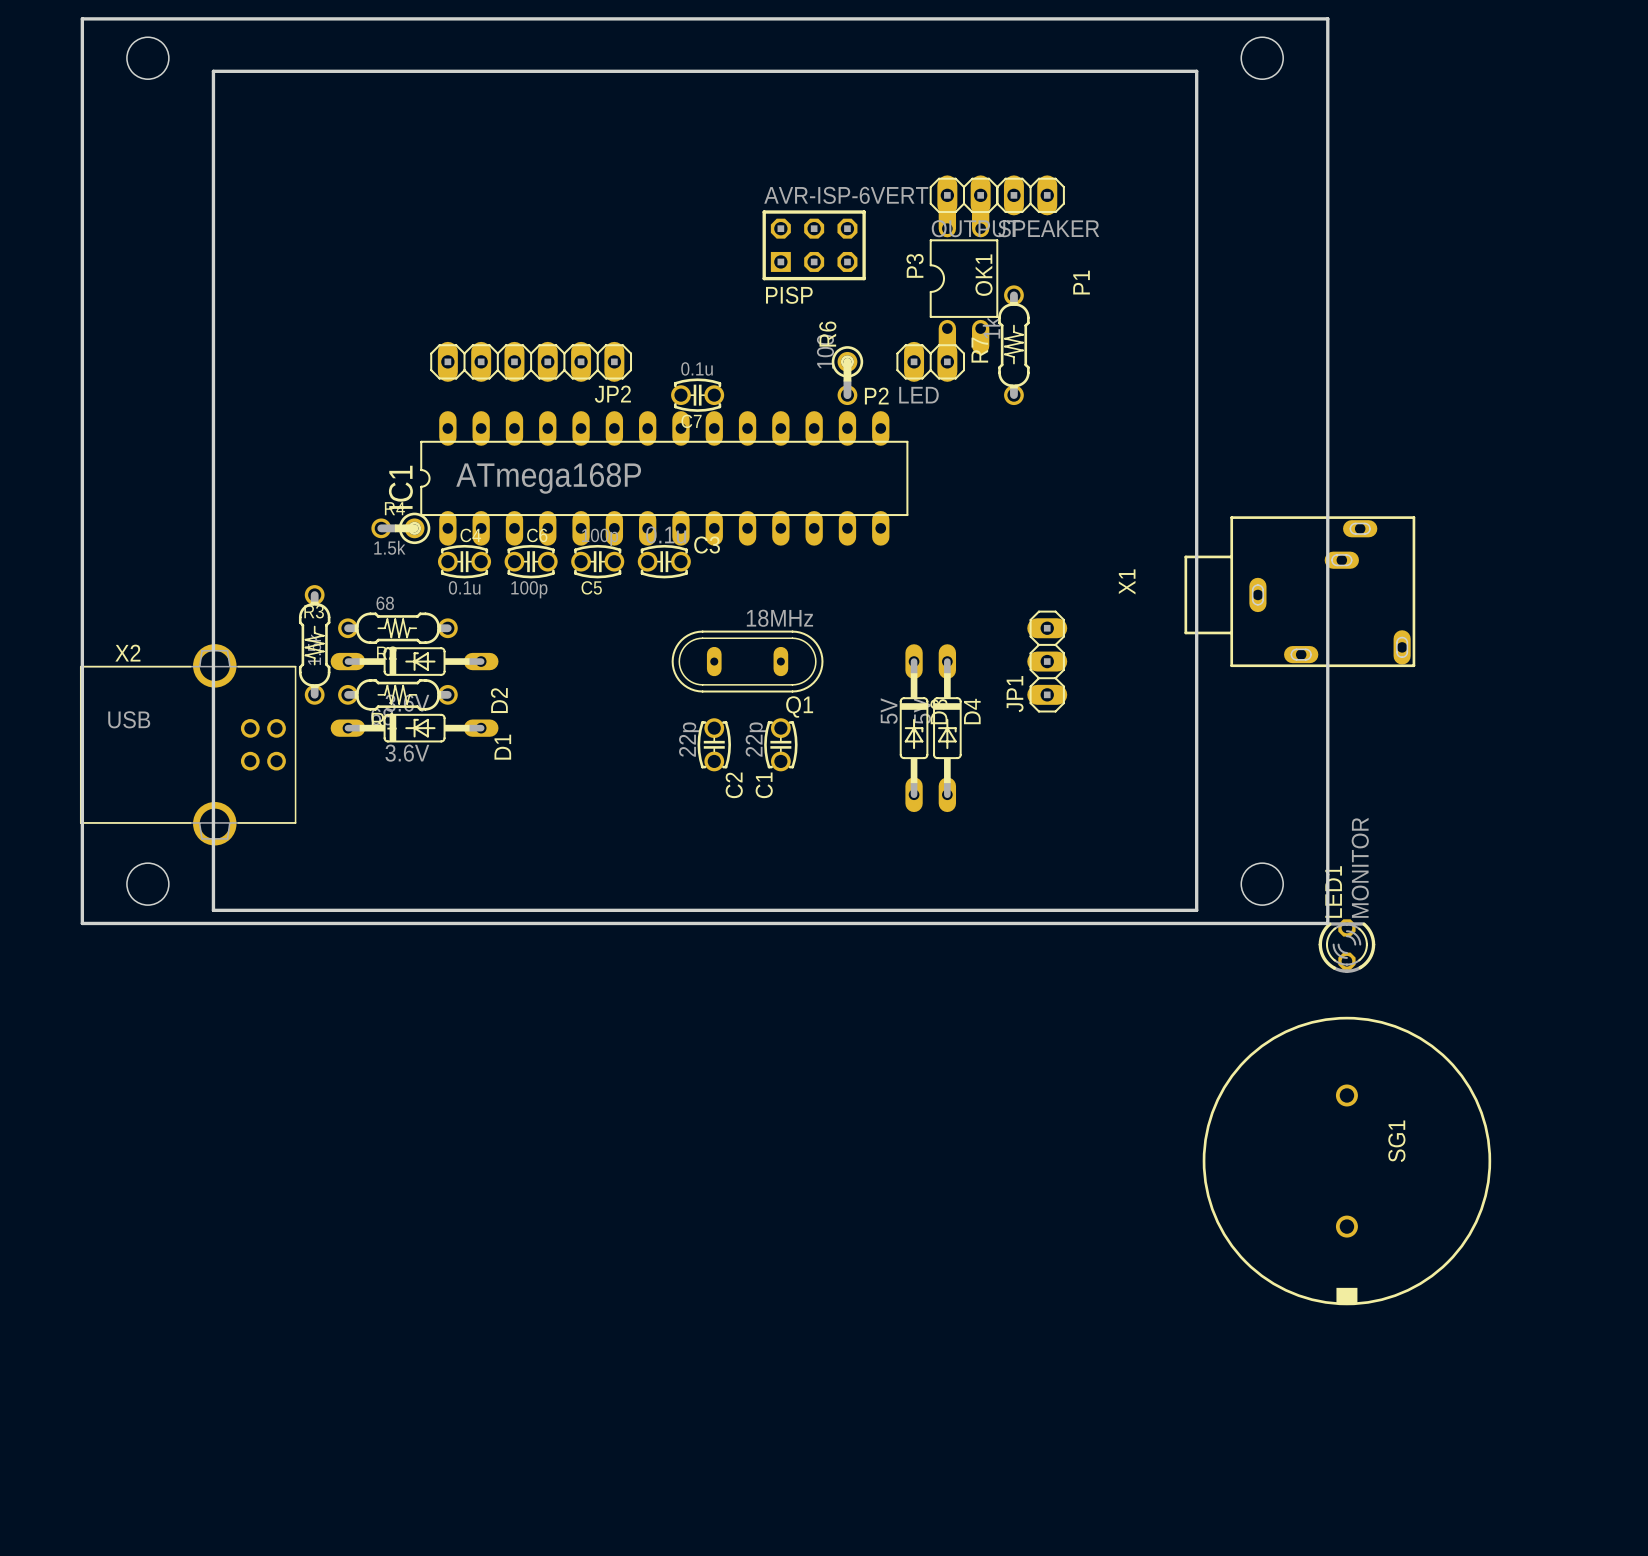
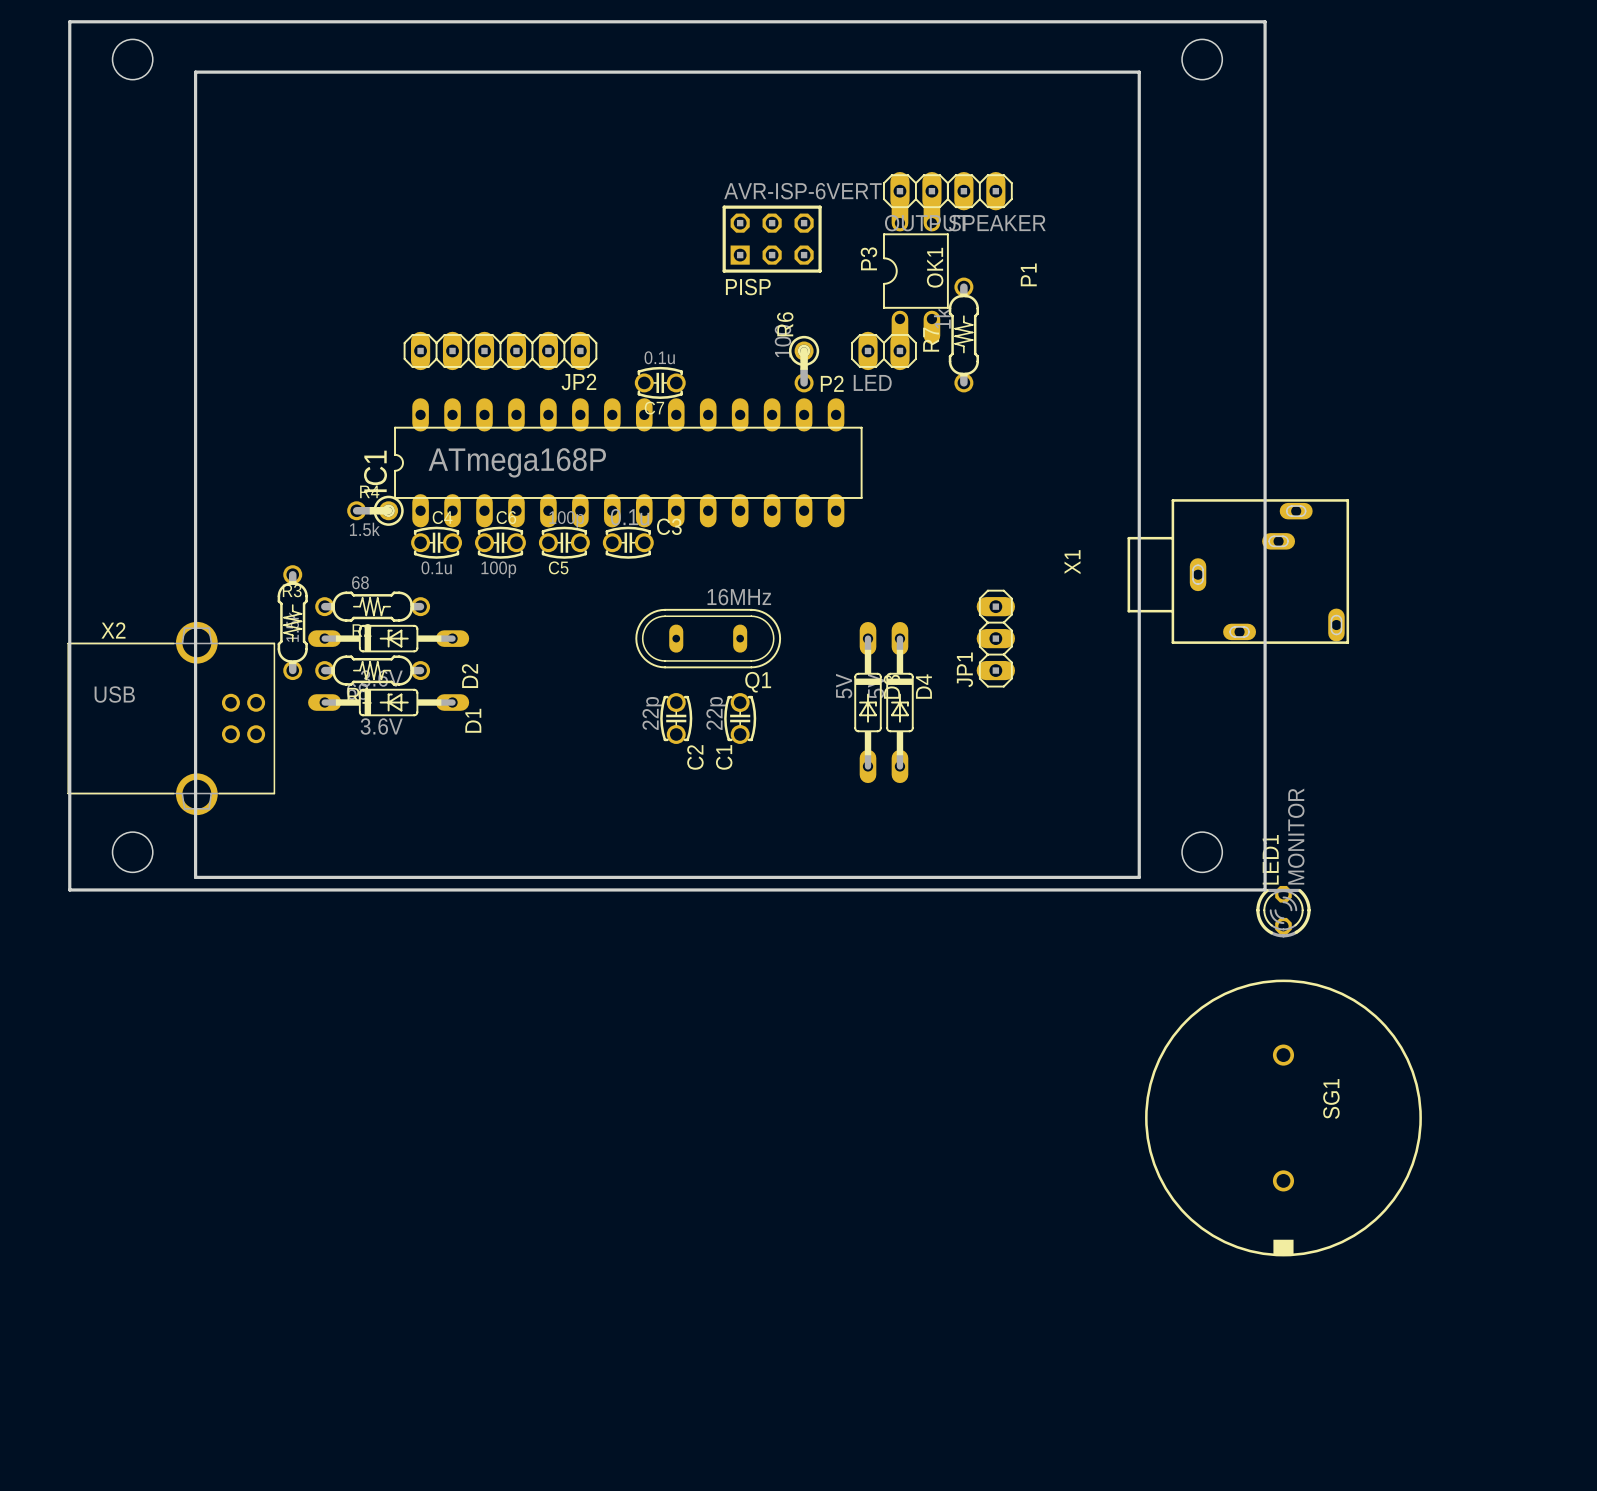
Q1 value: 18MHz (779, 618) -> 16MHz (739, 597)

